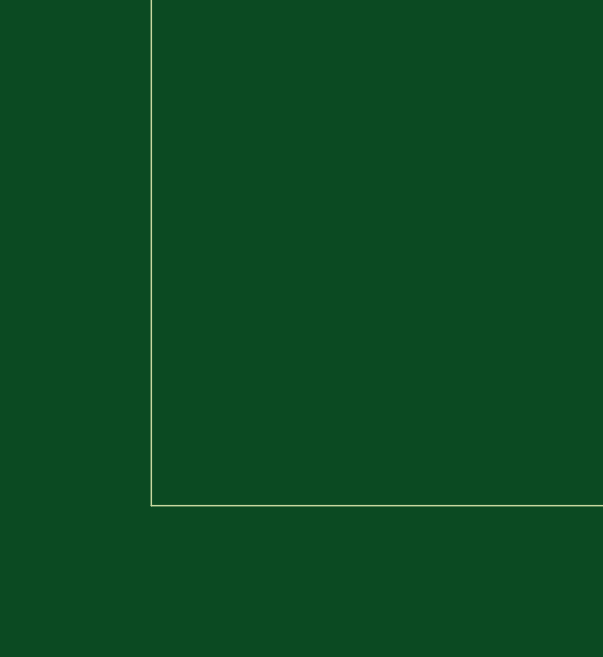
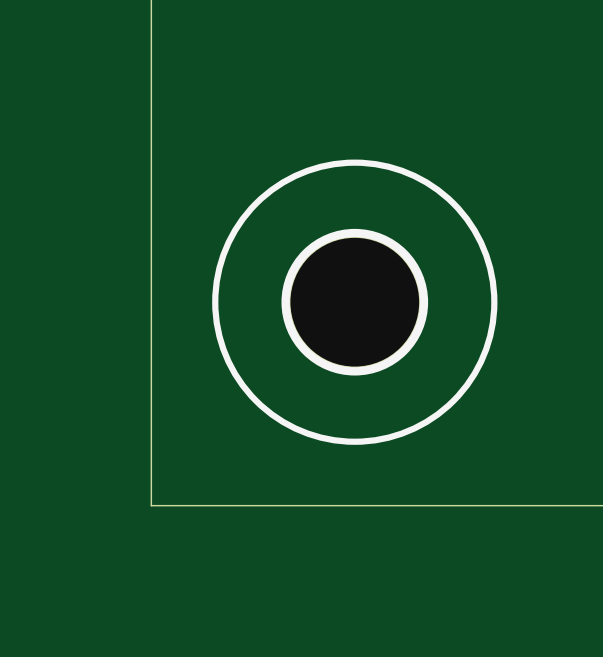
part: none -> (354, 302)

